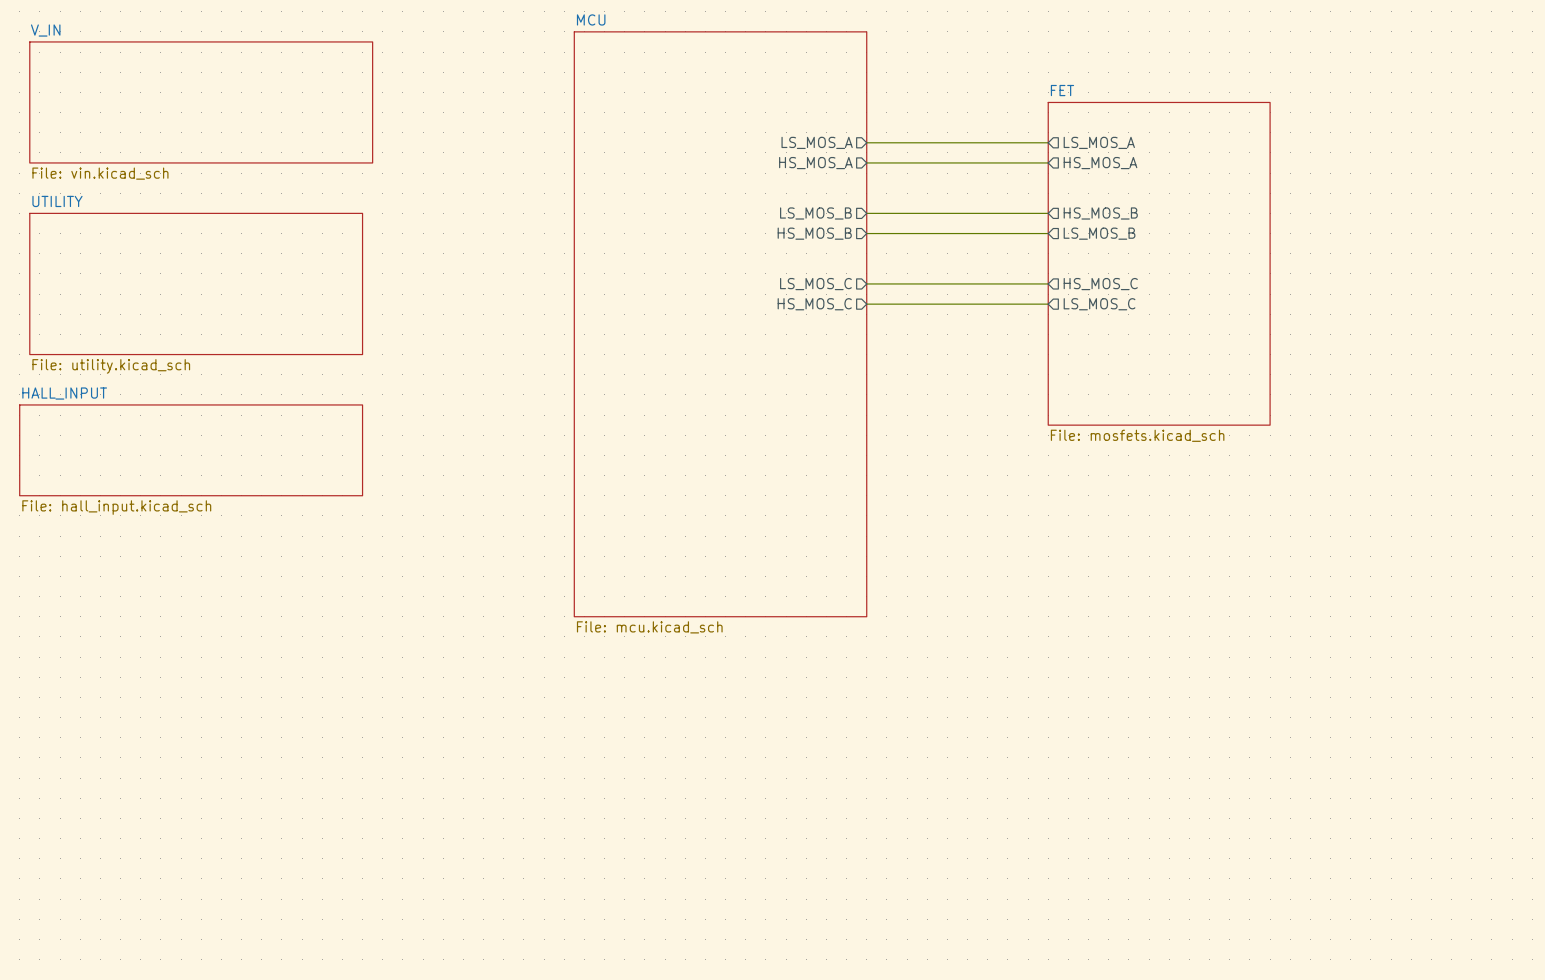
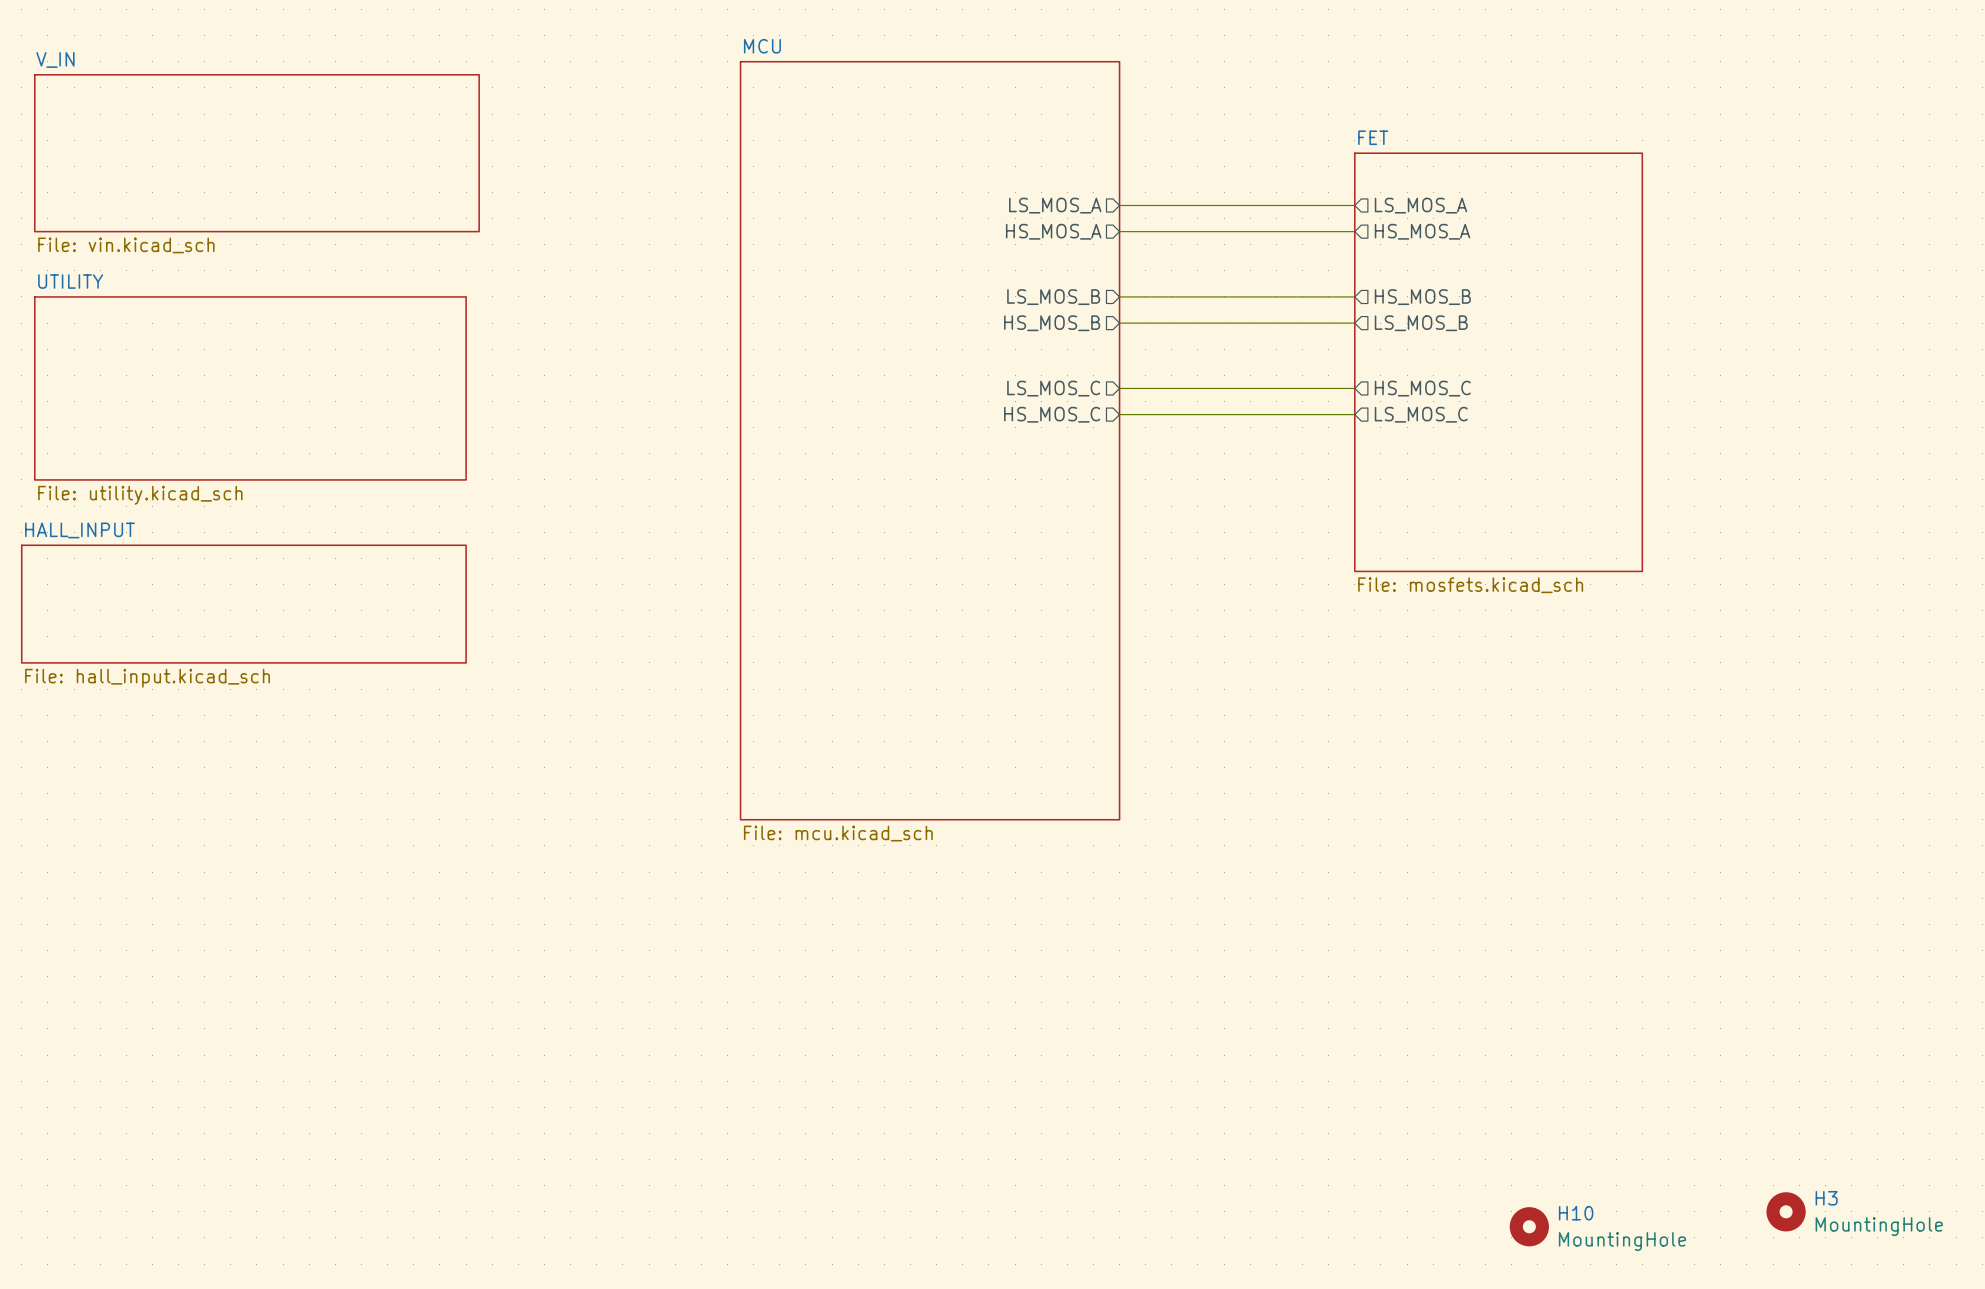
H3: none -> MountingHole (1786, 1211)
H10: none -> MountingHole (1529, 1226)

